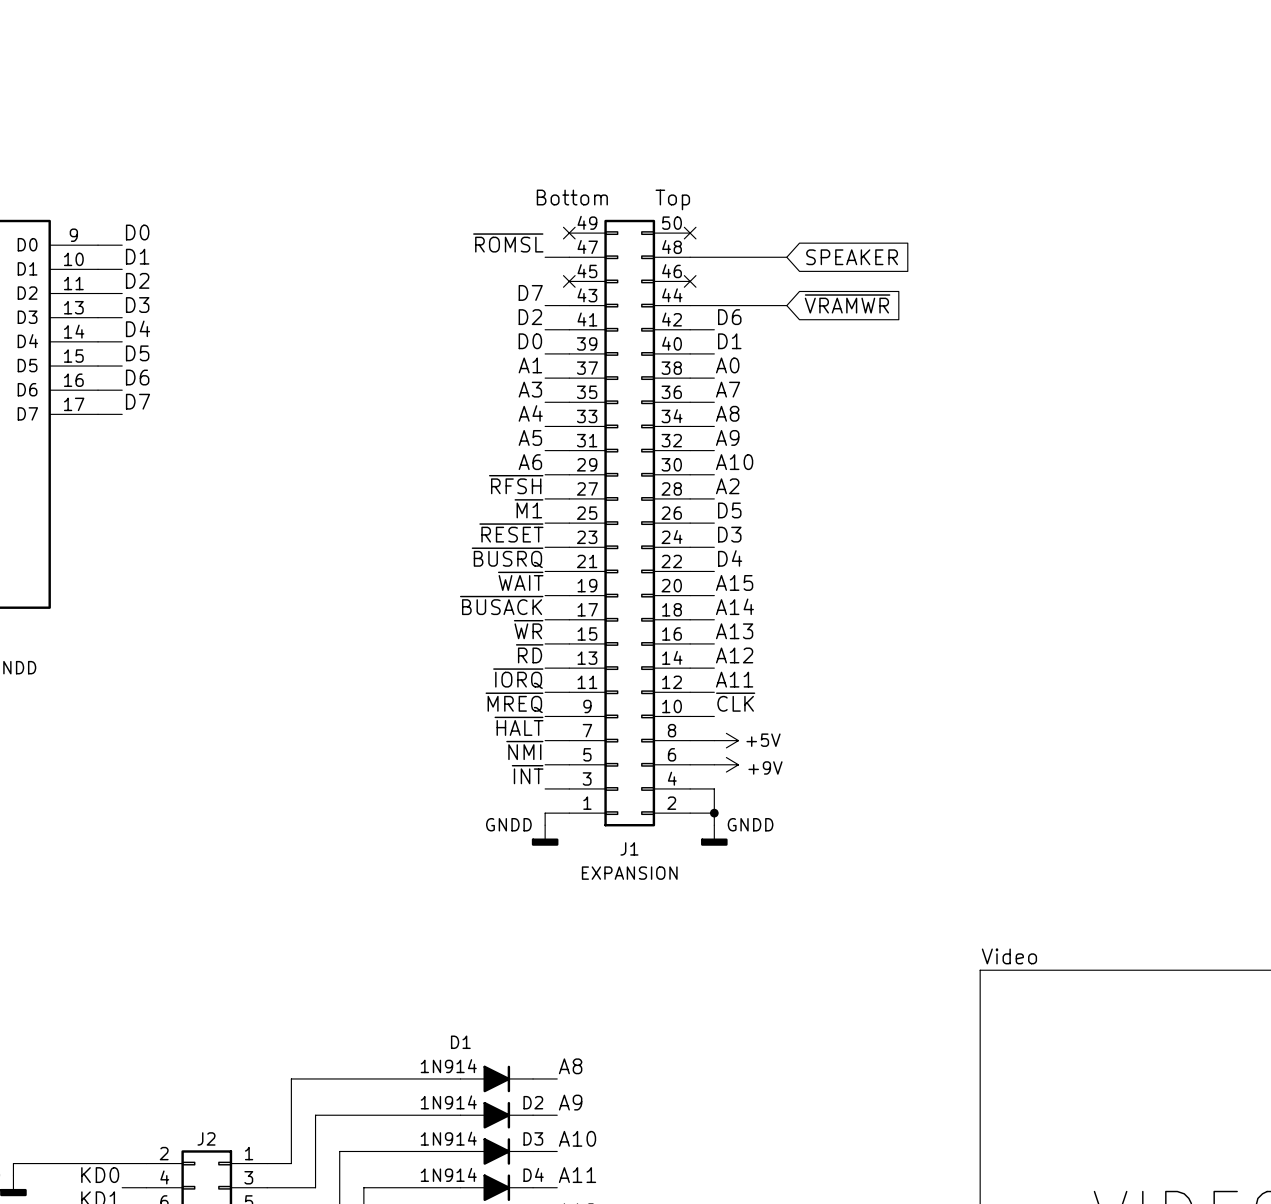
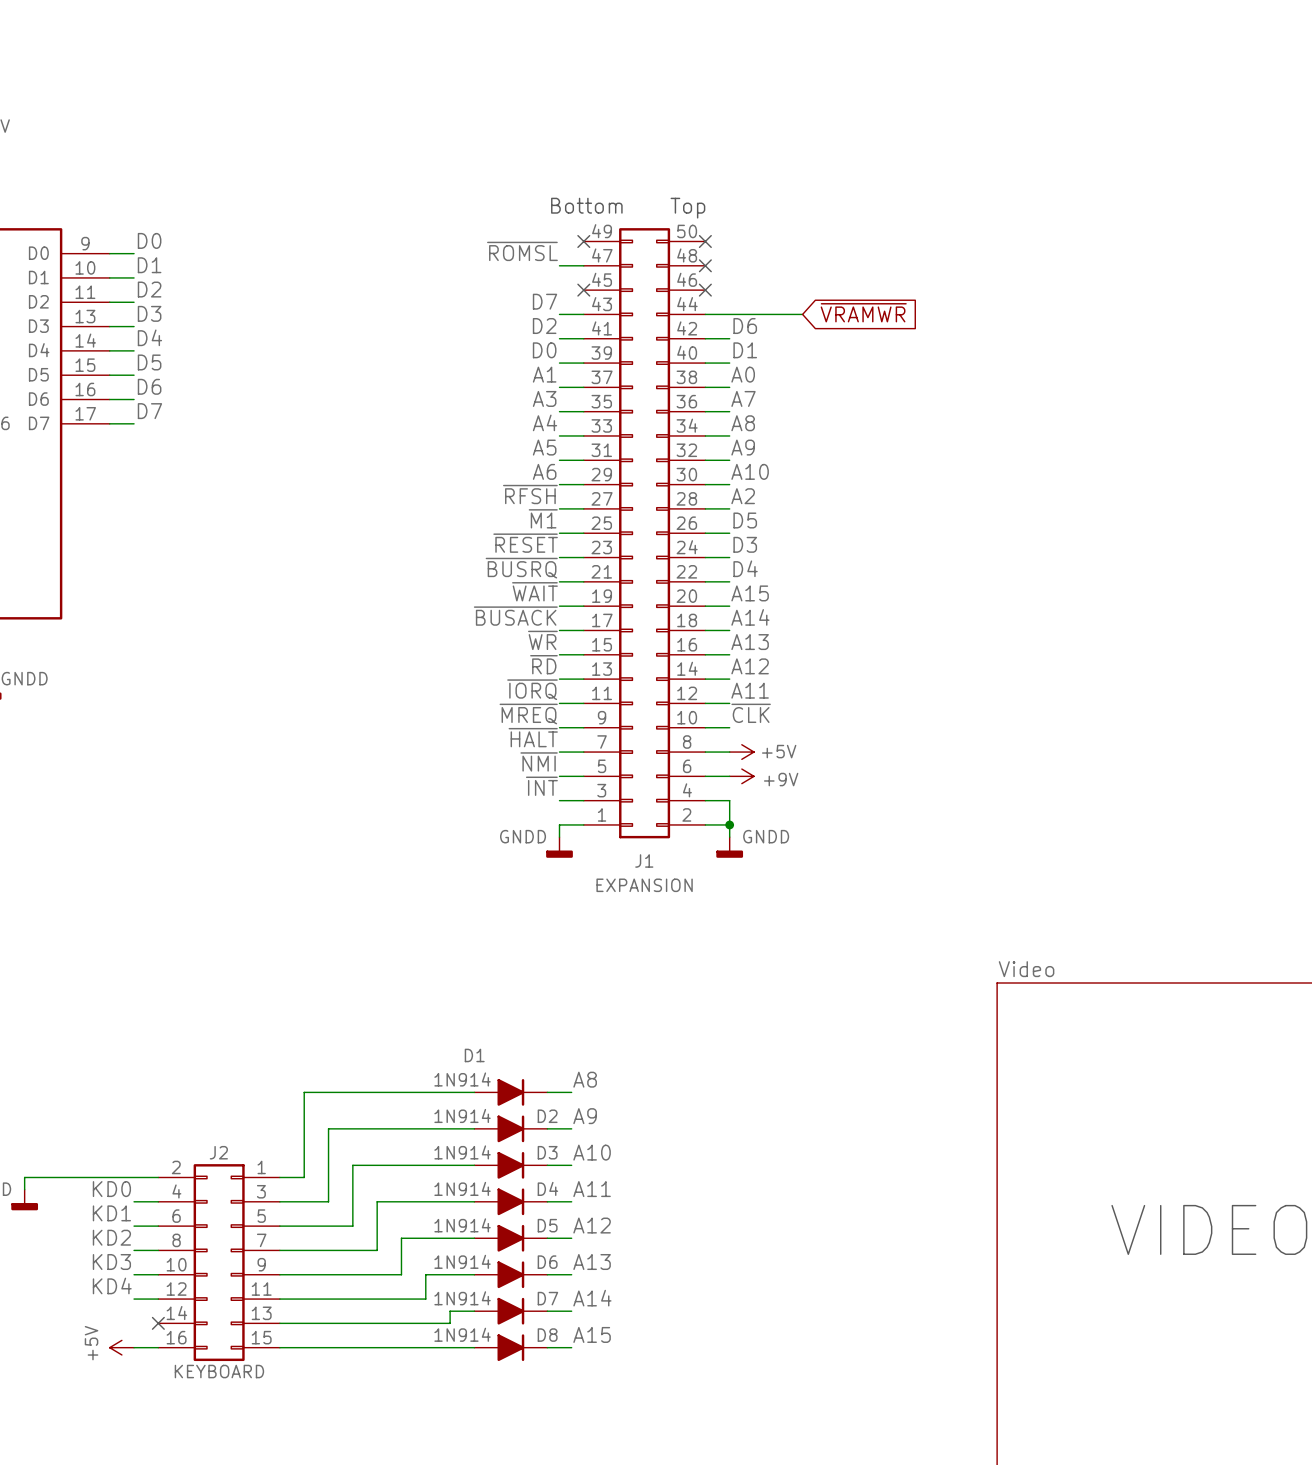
wire: (690, 257) (786, 257) -> none
no-connect mark: none -> (705, 265)
global label: SPEAKER (852, 257) -> none

